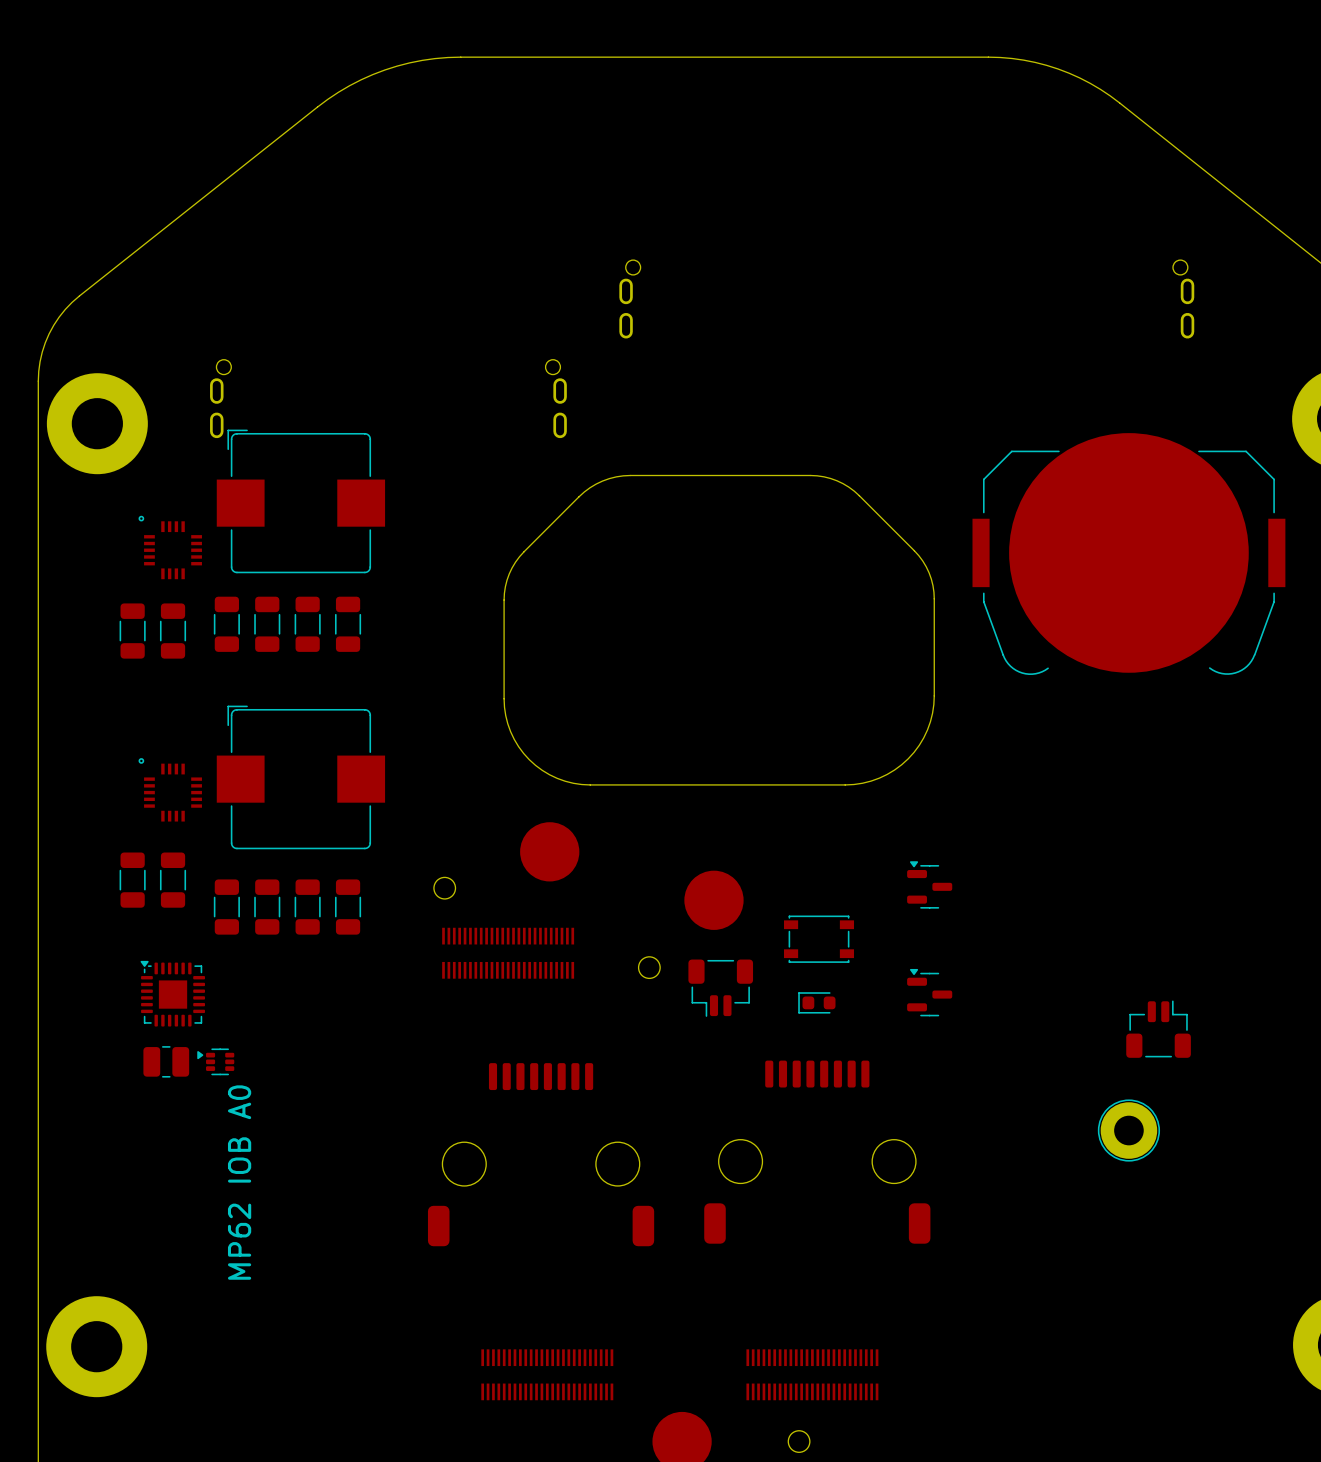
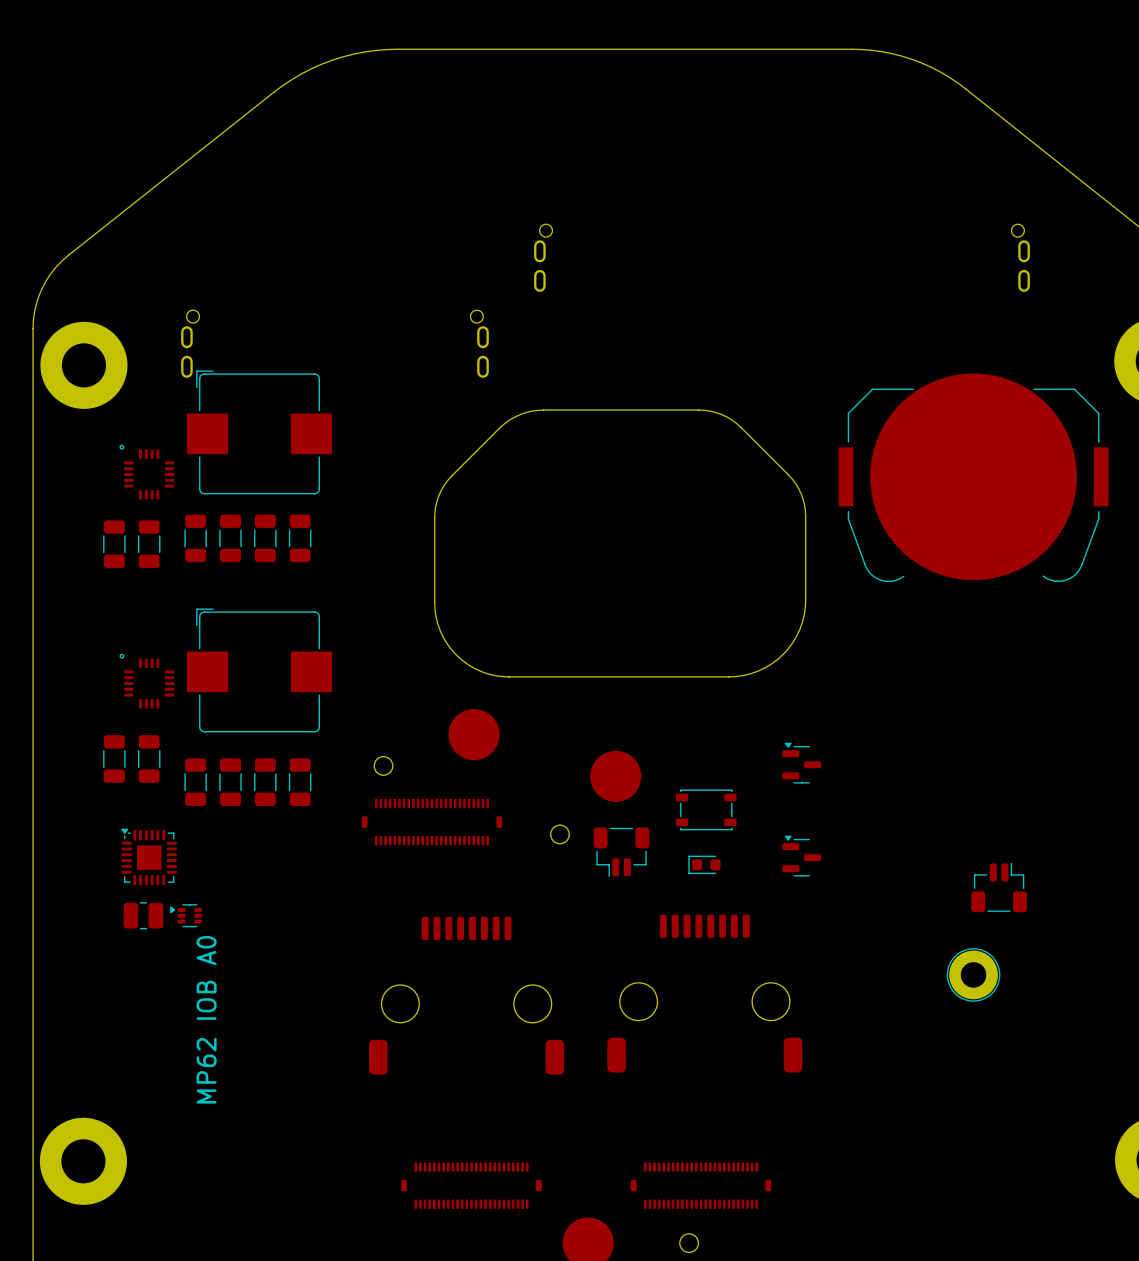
part footprint: [442, 927, 575, 979] -> [361, 798, 503, 846]
part footprint: [481, 1349, 614, 1401] -> [401, 1162, 542, 1209]
part footprint: [746, 1349, 879, 1401] -> [630, 1162, 772, 1209]

